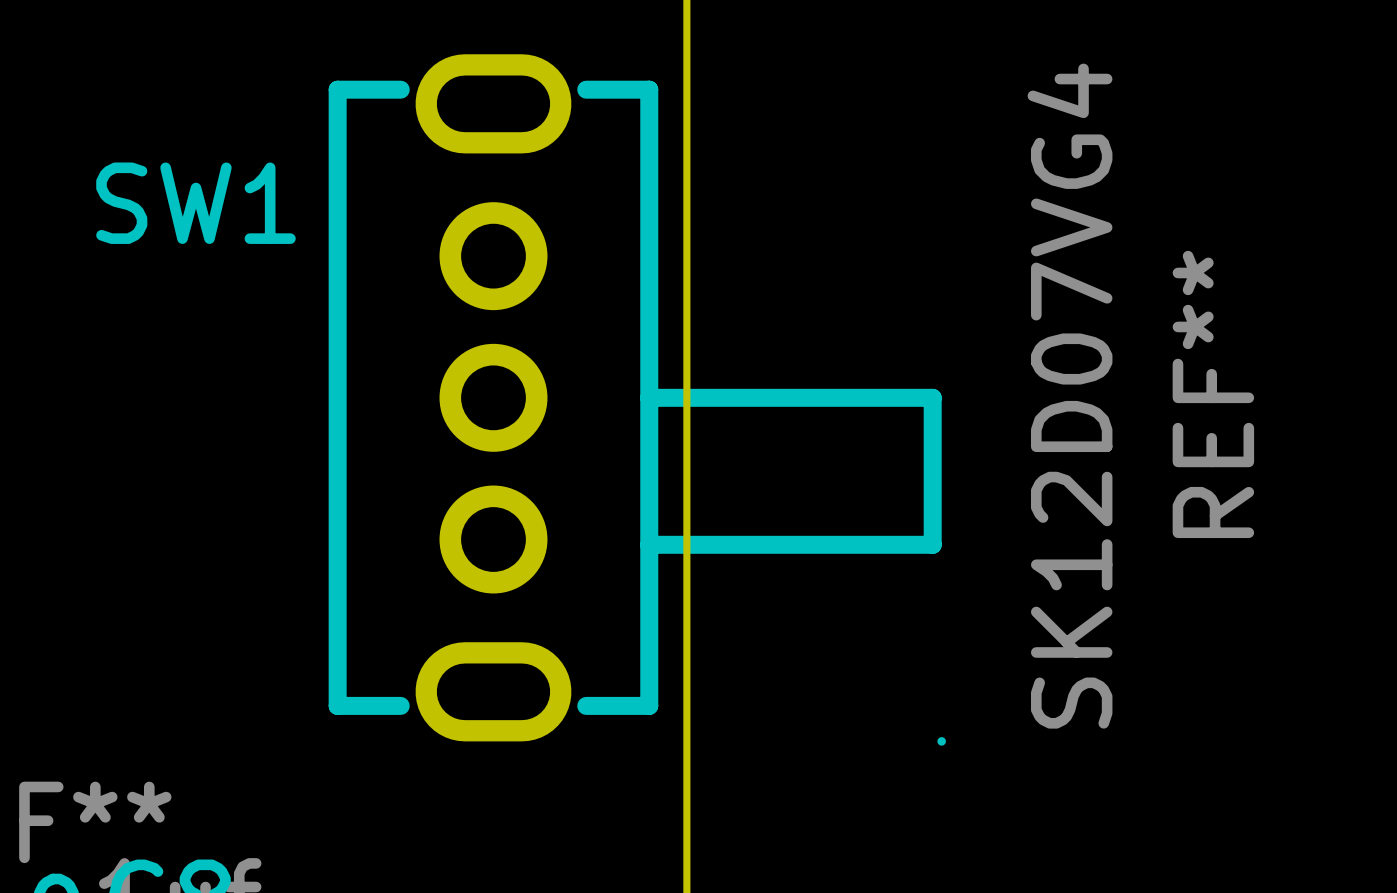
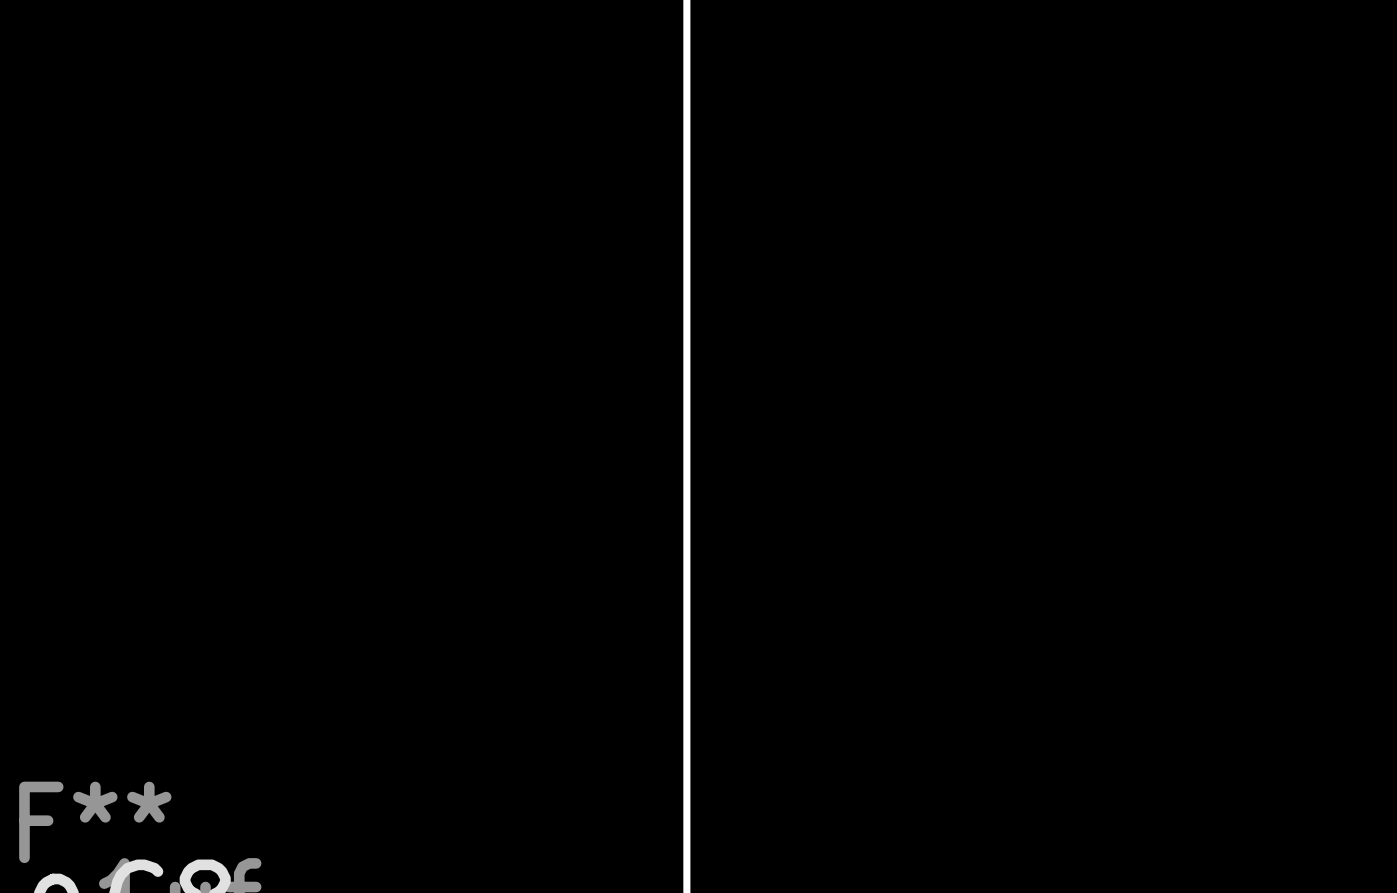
SW1: SK12D07VG4 (637, 399) -> none

